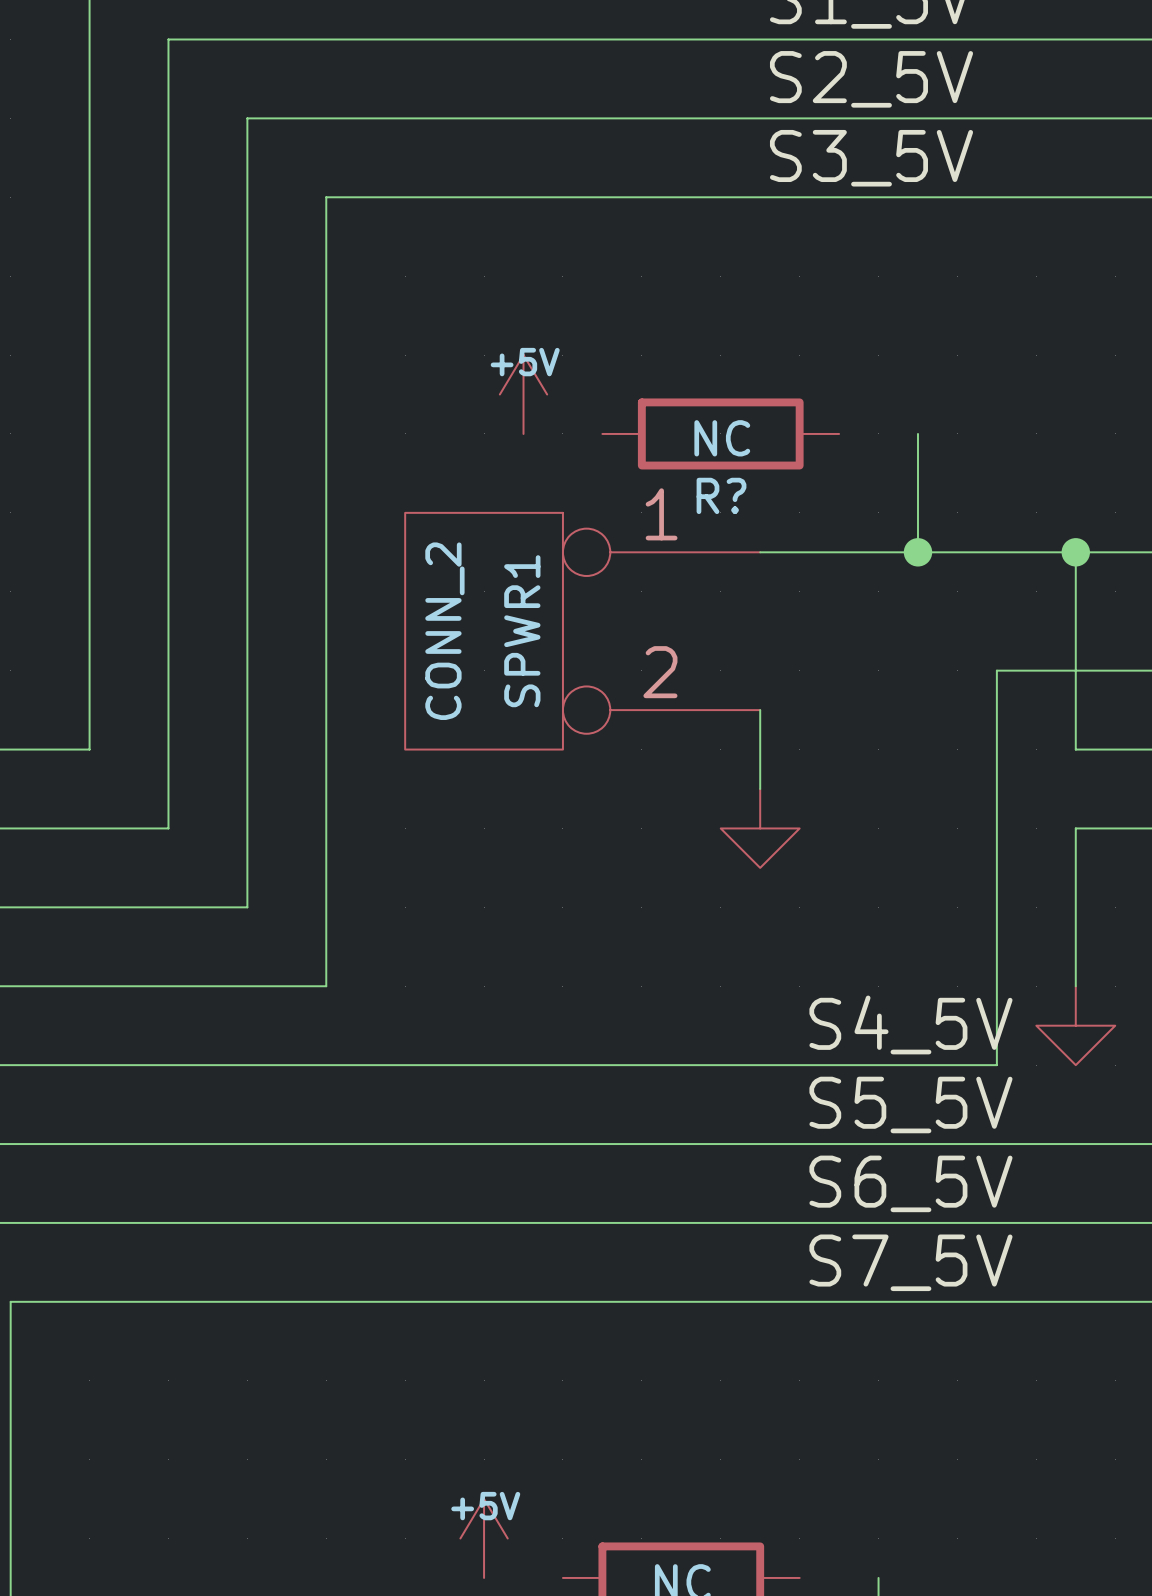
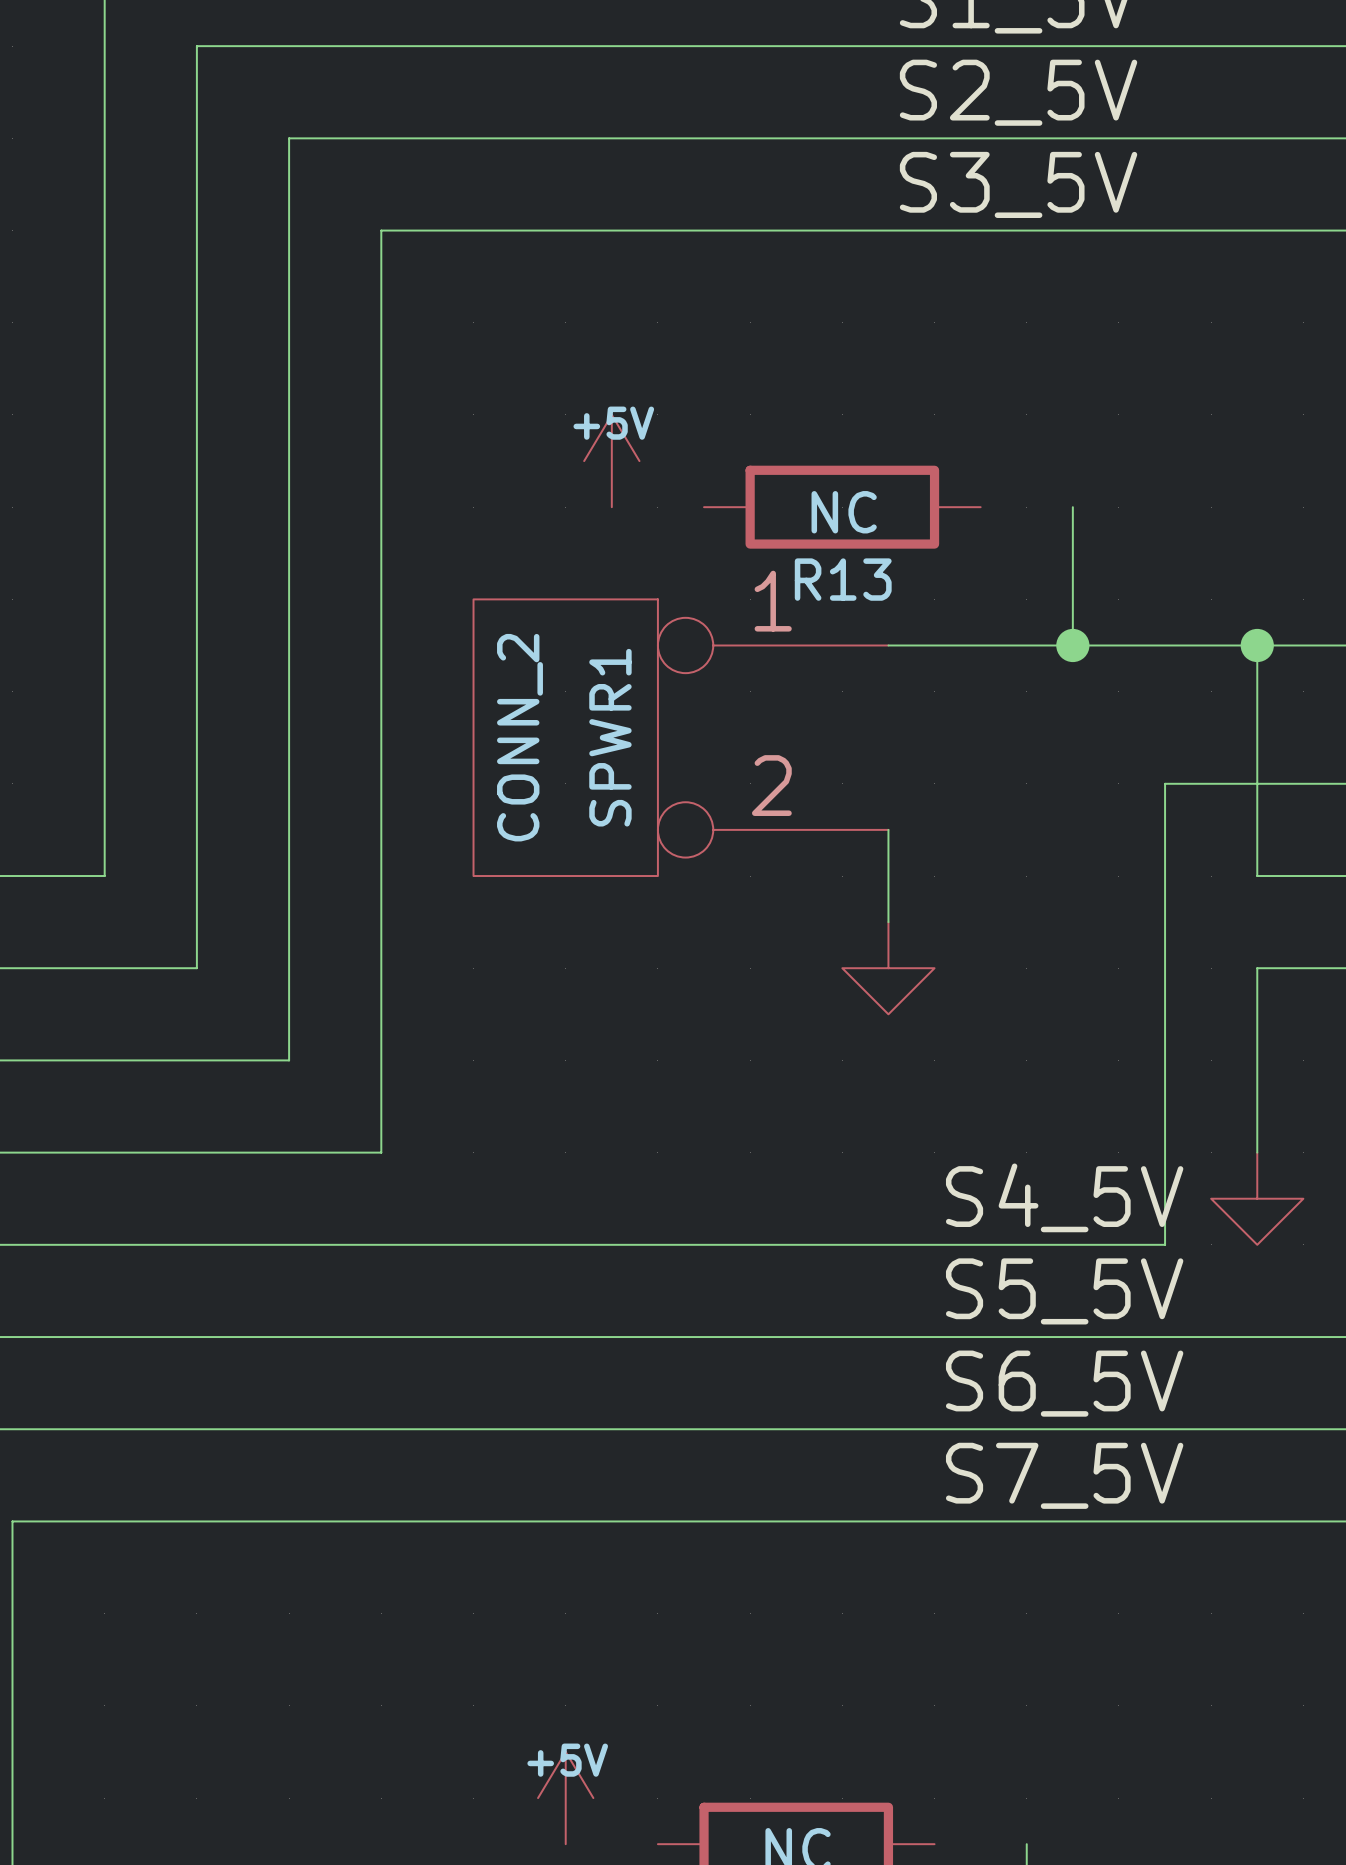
R? name: R? (721, 495) -> R13 (843, 579)

